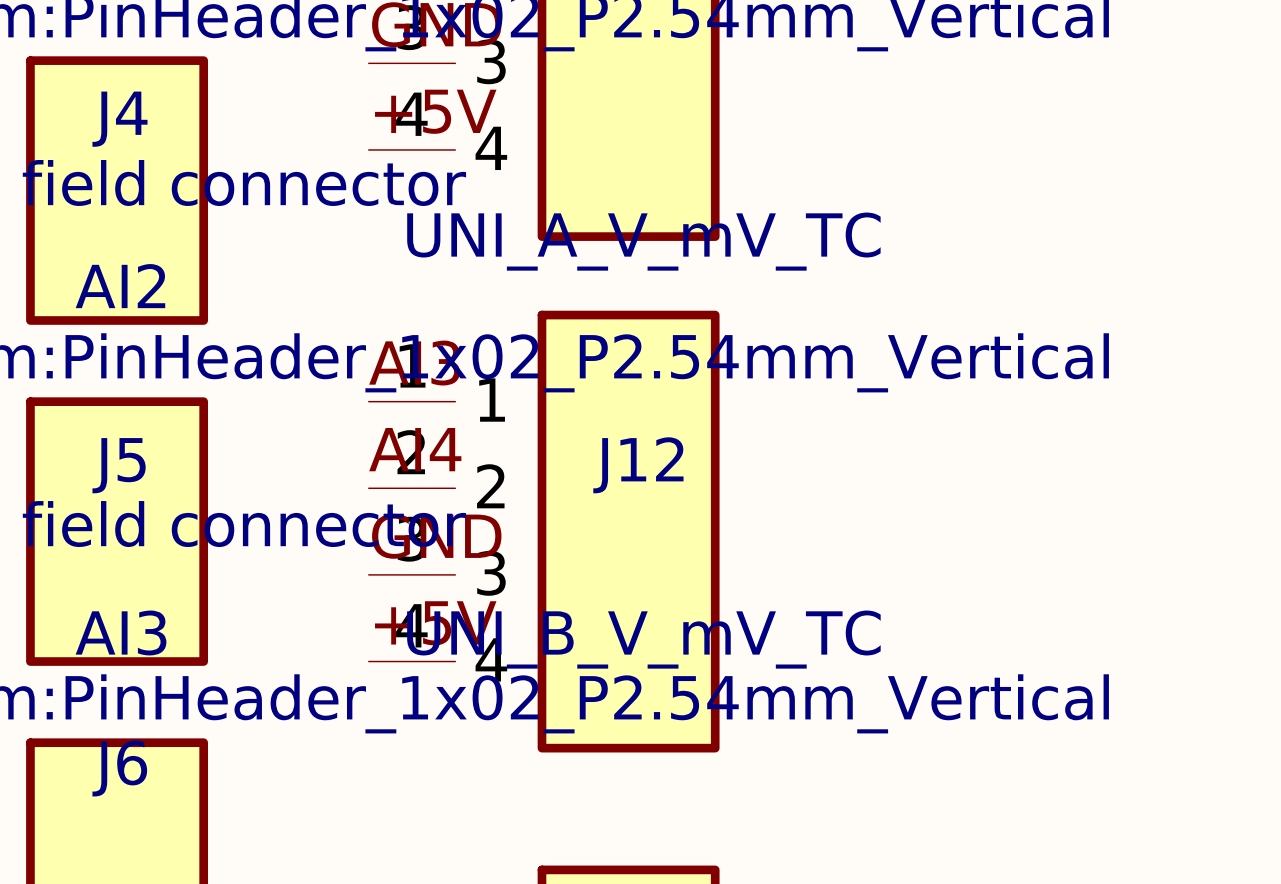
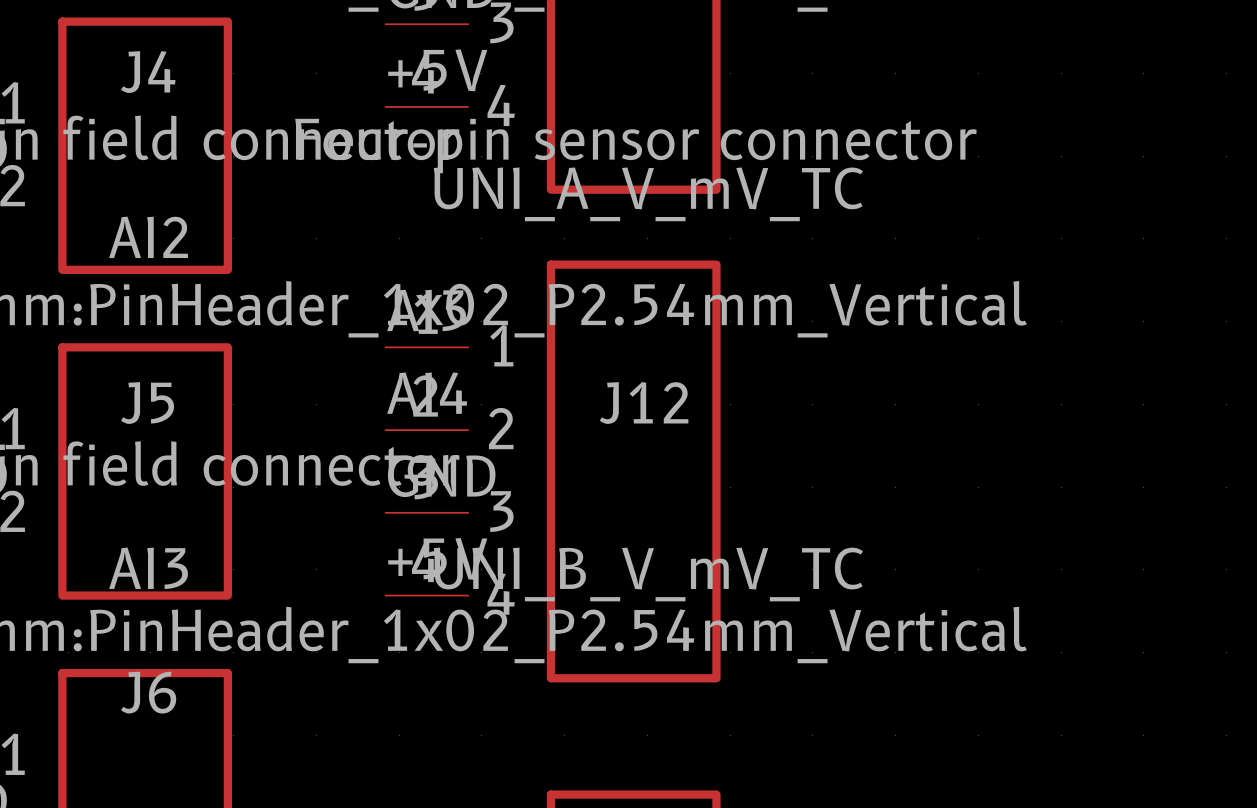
J12 text: none -> Four-pin sensor connector (635, 146)

